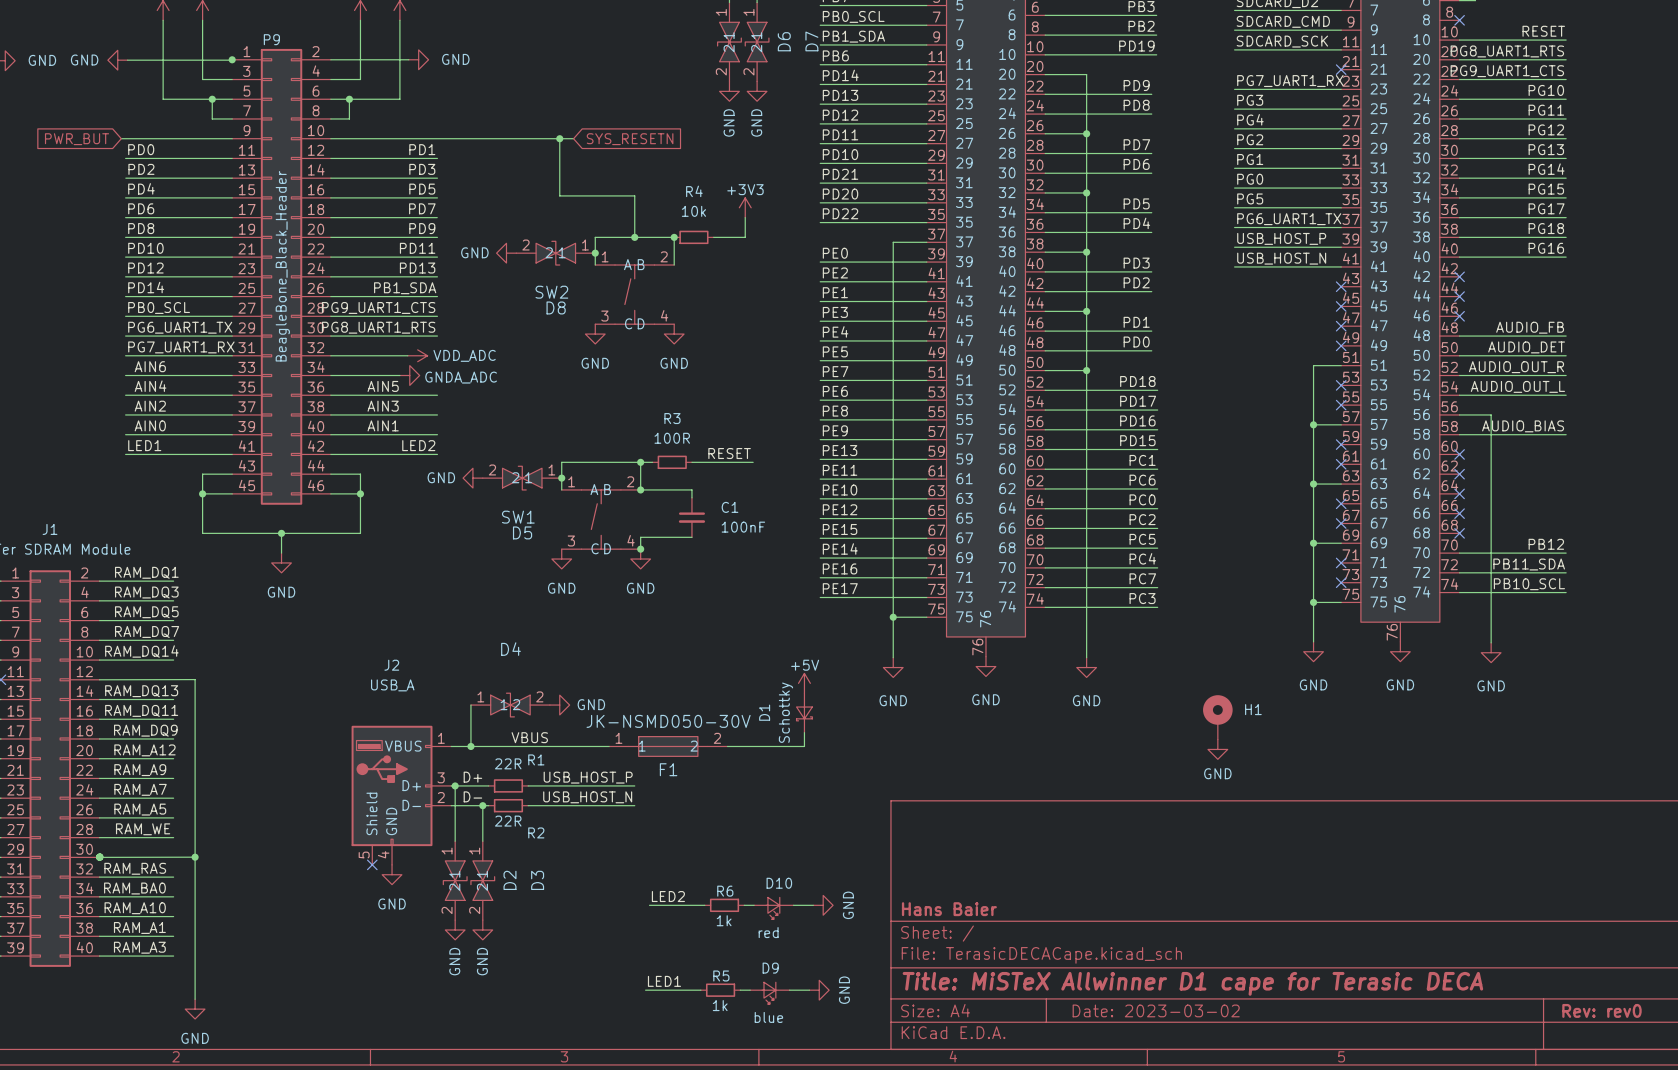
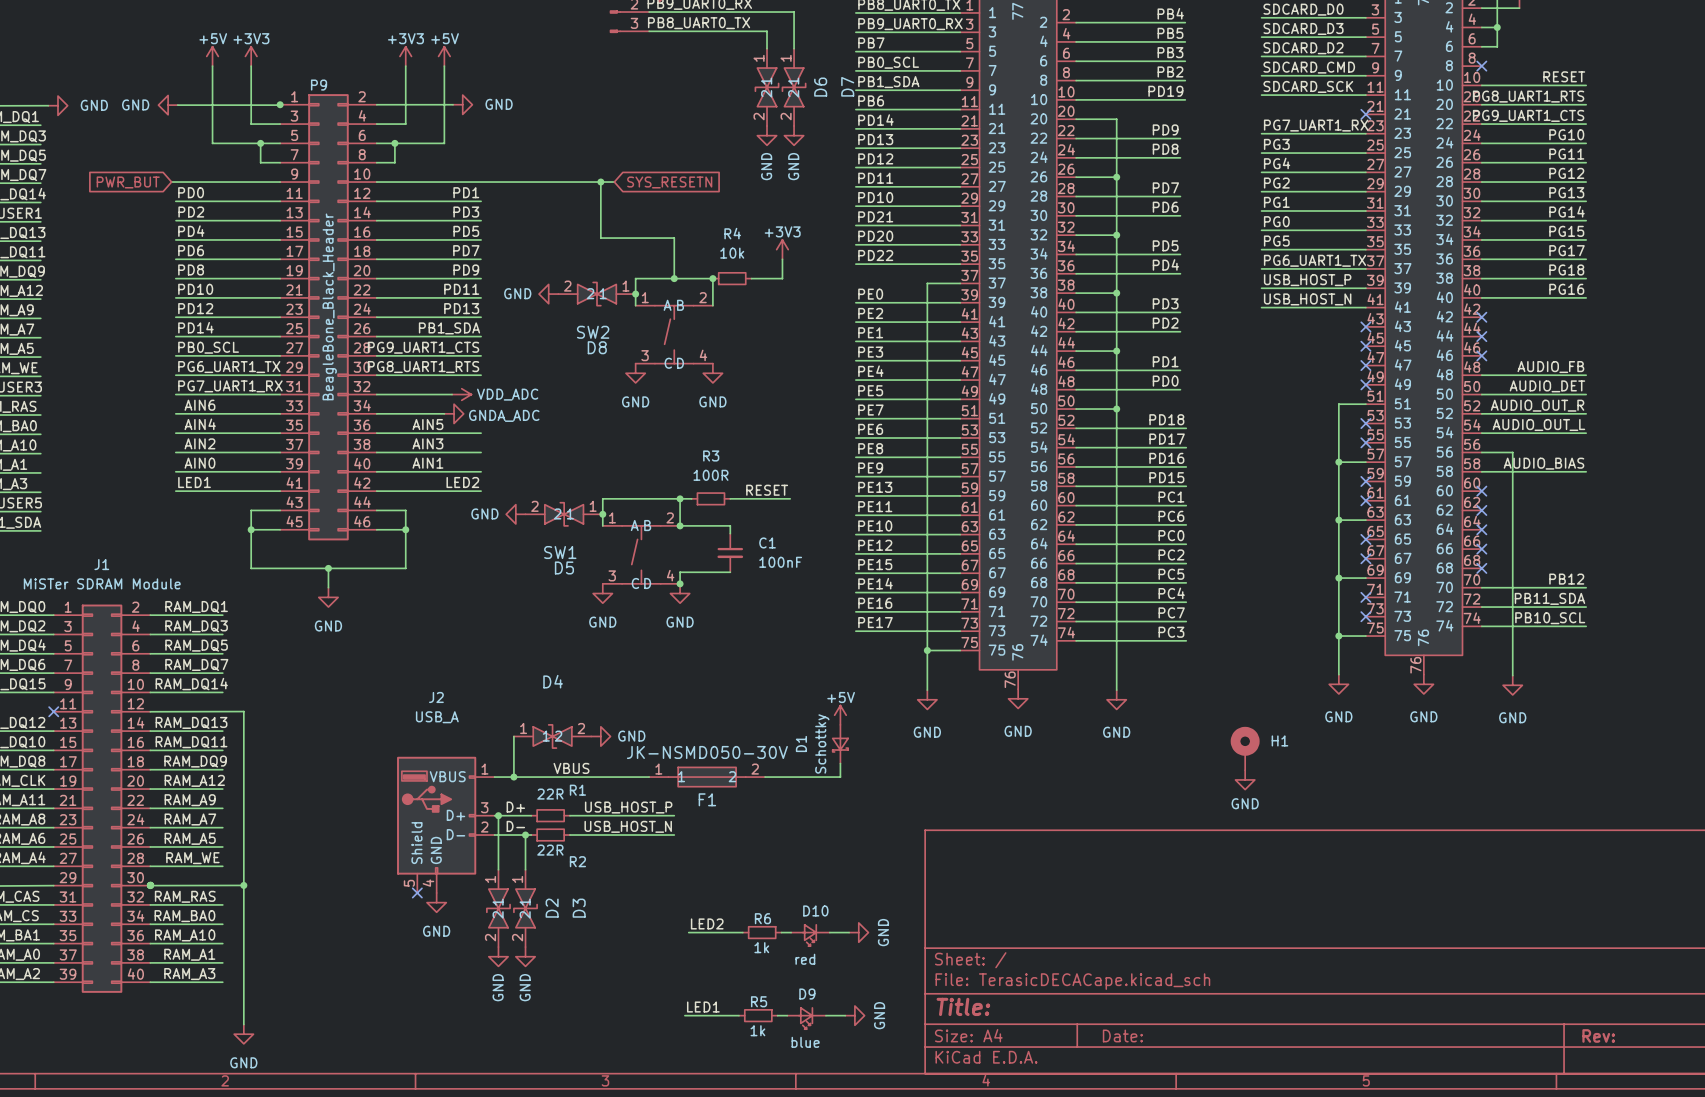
title block: Hans Baier (949, 909) -> none
title block: Title: MiSTeX Allwinner D1 cape for Terasic DECA (1192, 983) -> Title: (963, 1006)
title block: Date: 2023-03-02 (1156, 1010) -> Date: (1122, 1035)
title block: Rev: rev0 (1601, 1010) -> Rev: (1598, 1035)

